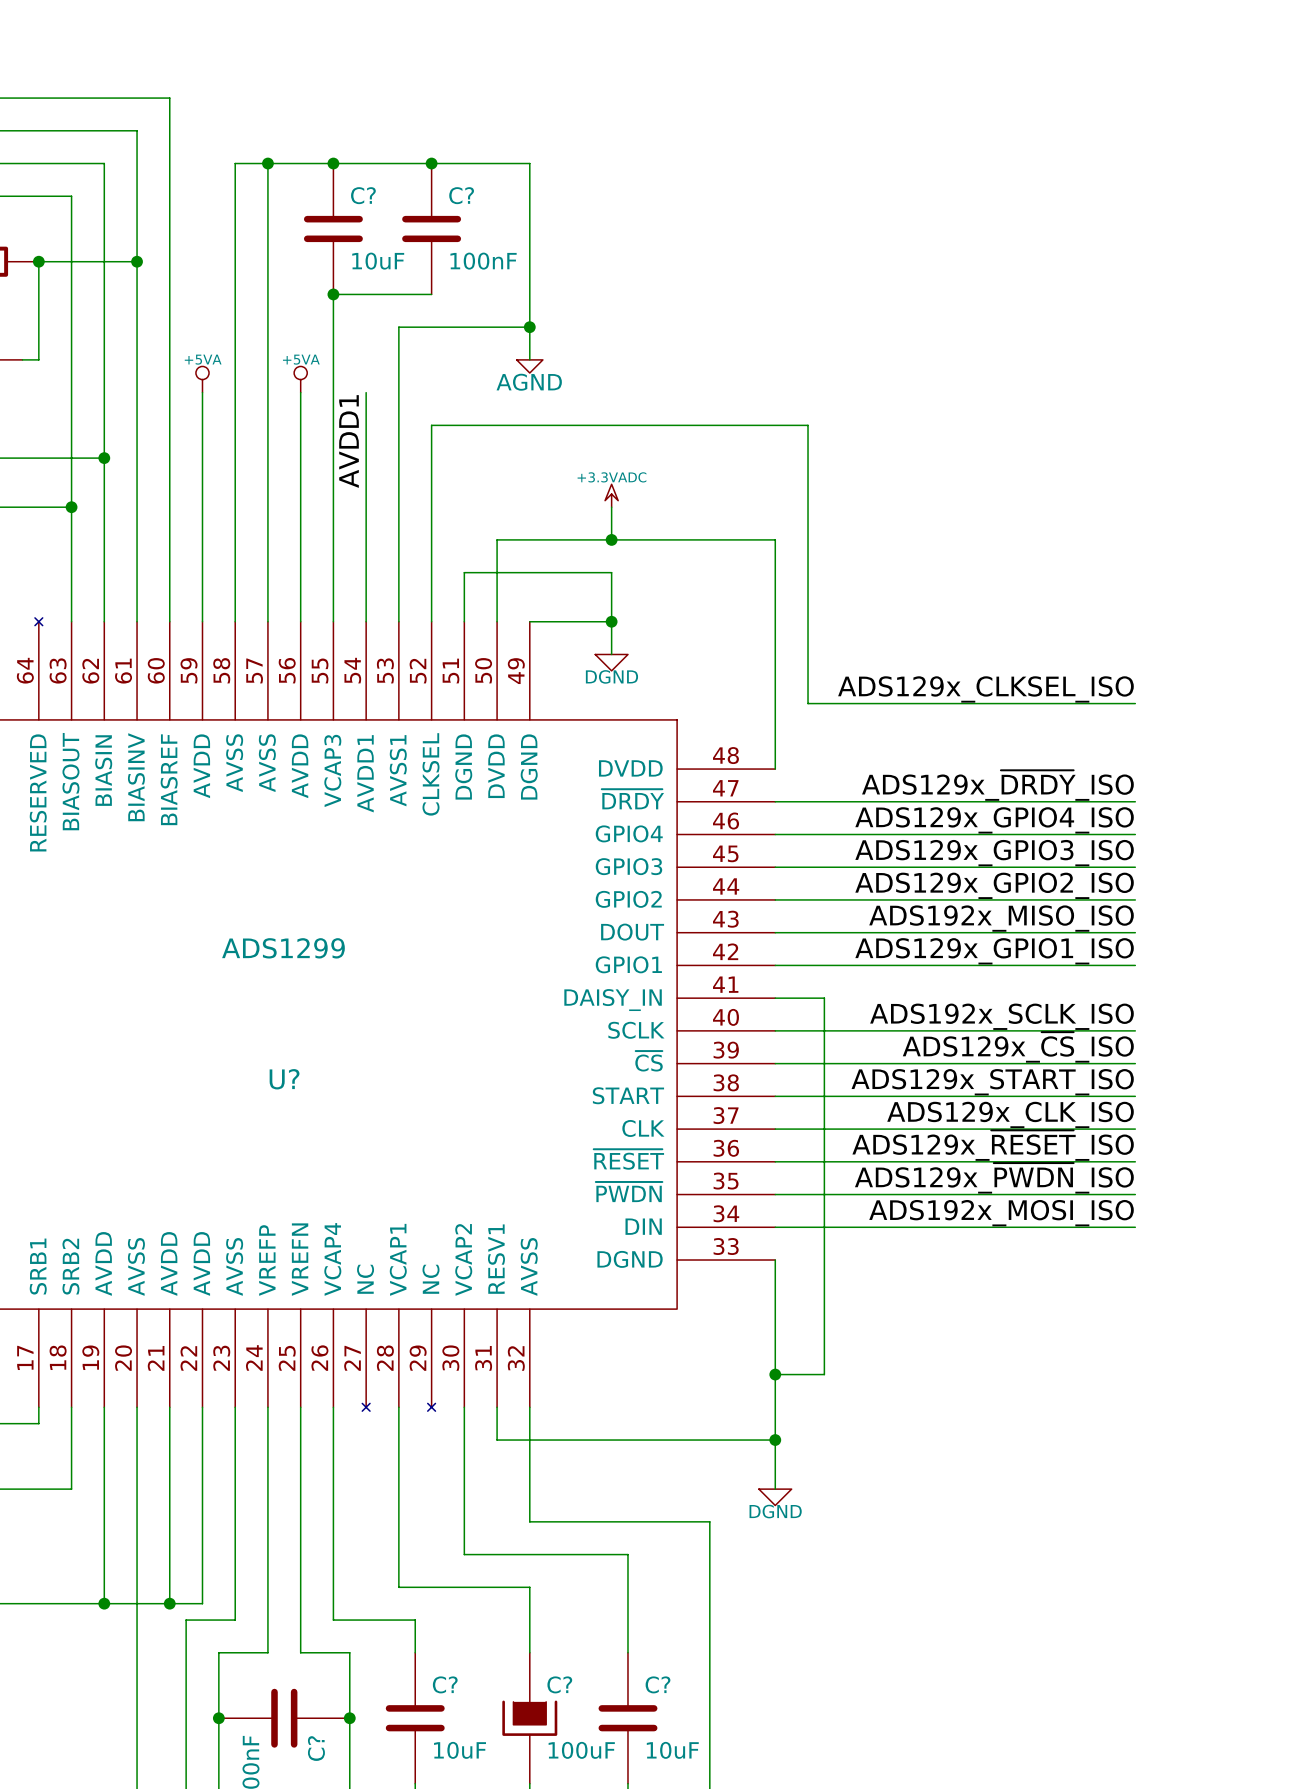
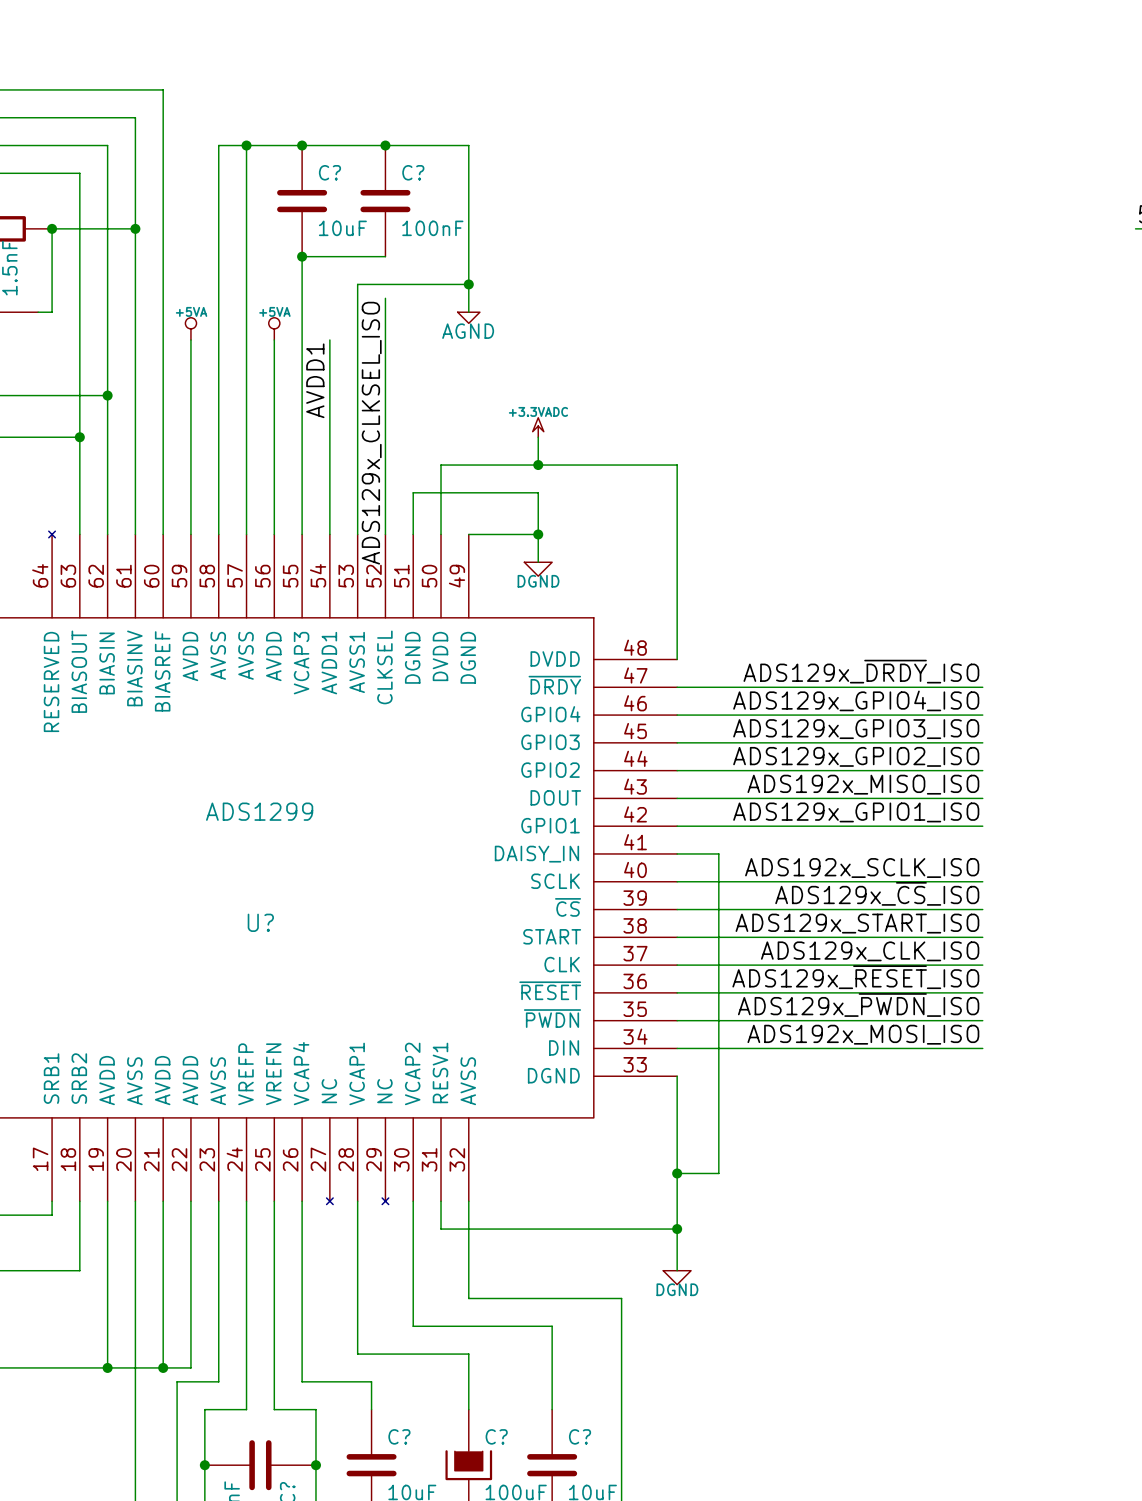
wire: (431, 425) (808, 425) (808, 703) (1135, 703) -> (385, 367) (385, 298)
label: none -> ADS129x_CLKSEL_ISO (371, 433)
label: ADS129x_CLKSEL_ISO (985, 689) -> none

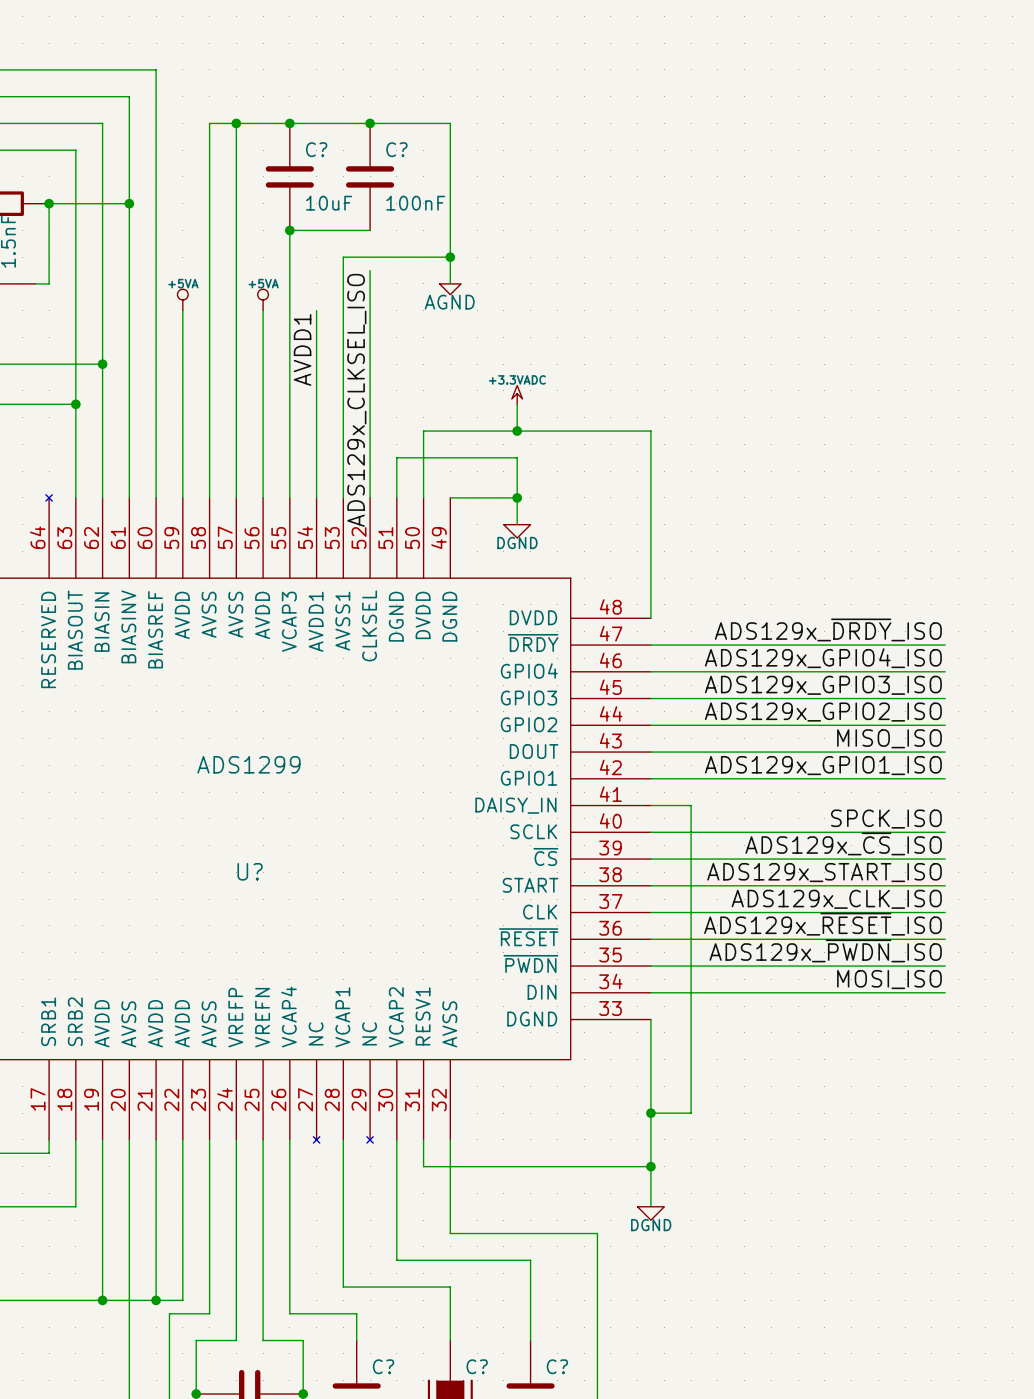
label: ADS192x_MISO_ISO (863, 784) -> MISO_ISO (889, 738)
label: ADS192x_SCLK_ISO (862, 868) -> SPCK_ISO (886, 819)
label: ADS192x_MOSI_ISO (863, 1034) -> MOSI_ISO (889, 979)

